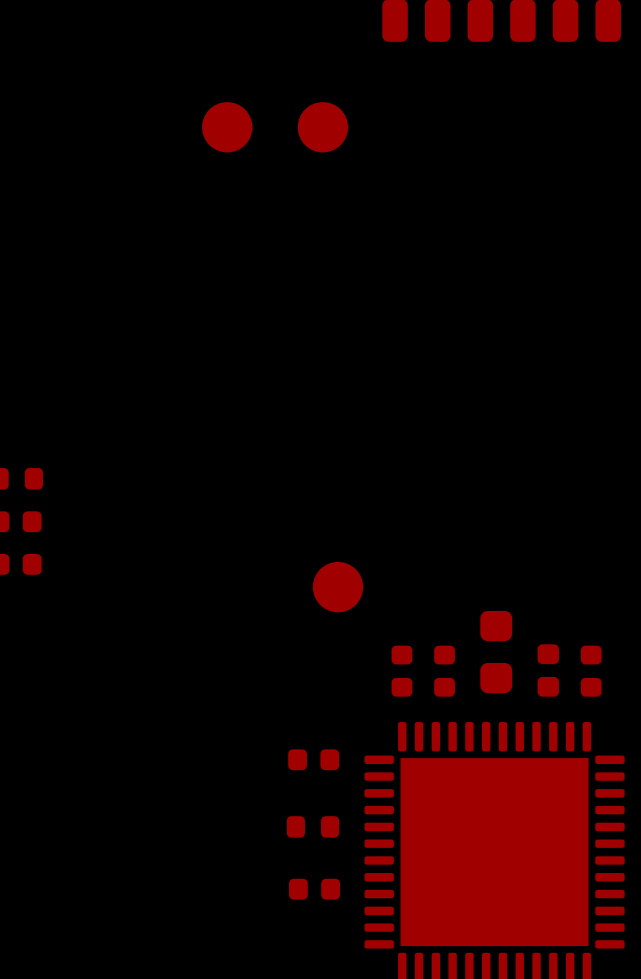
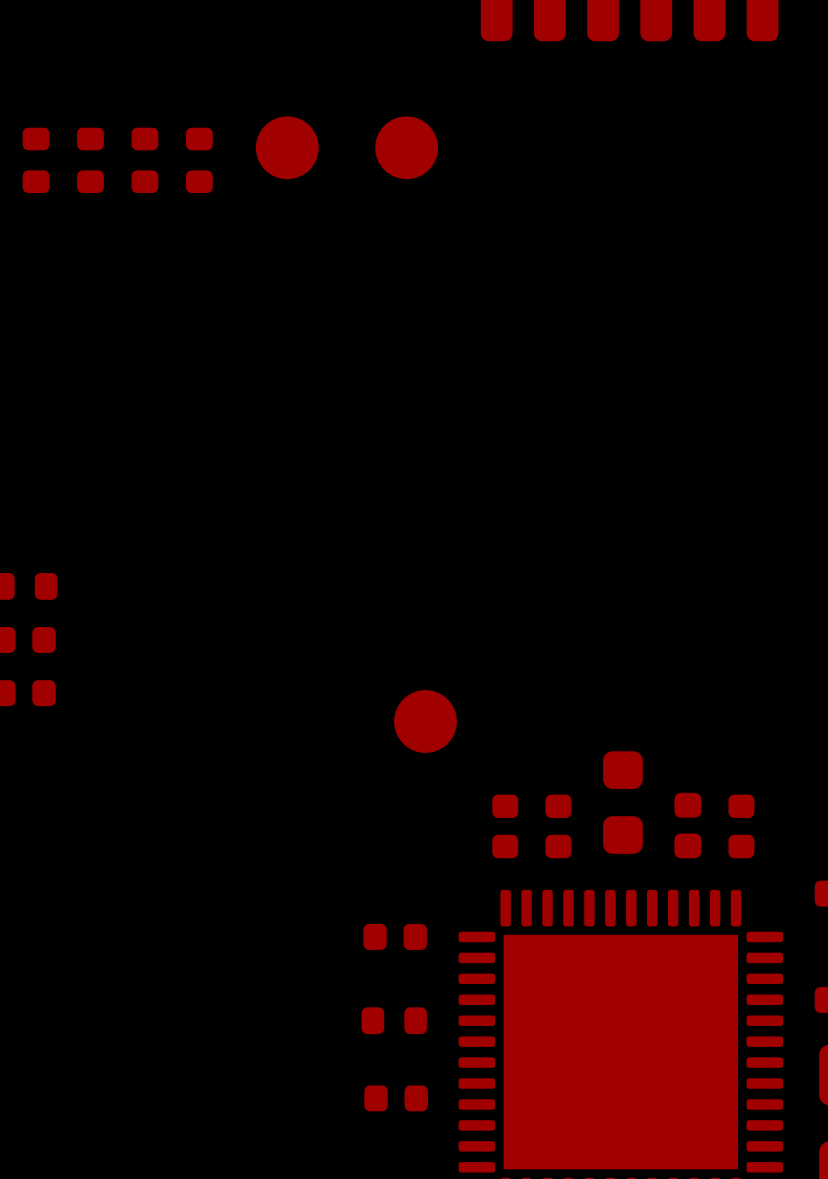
part: none -> (36, 160)
part: none -> (90, 160)
part: none -> (144, 160)
part: none -> (199, 160)

